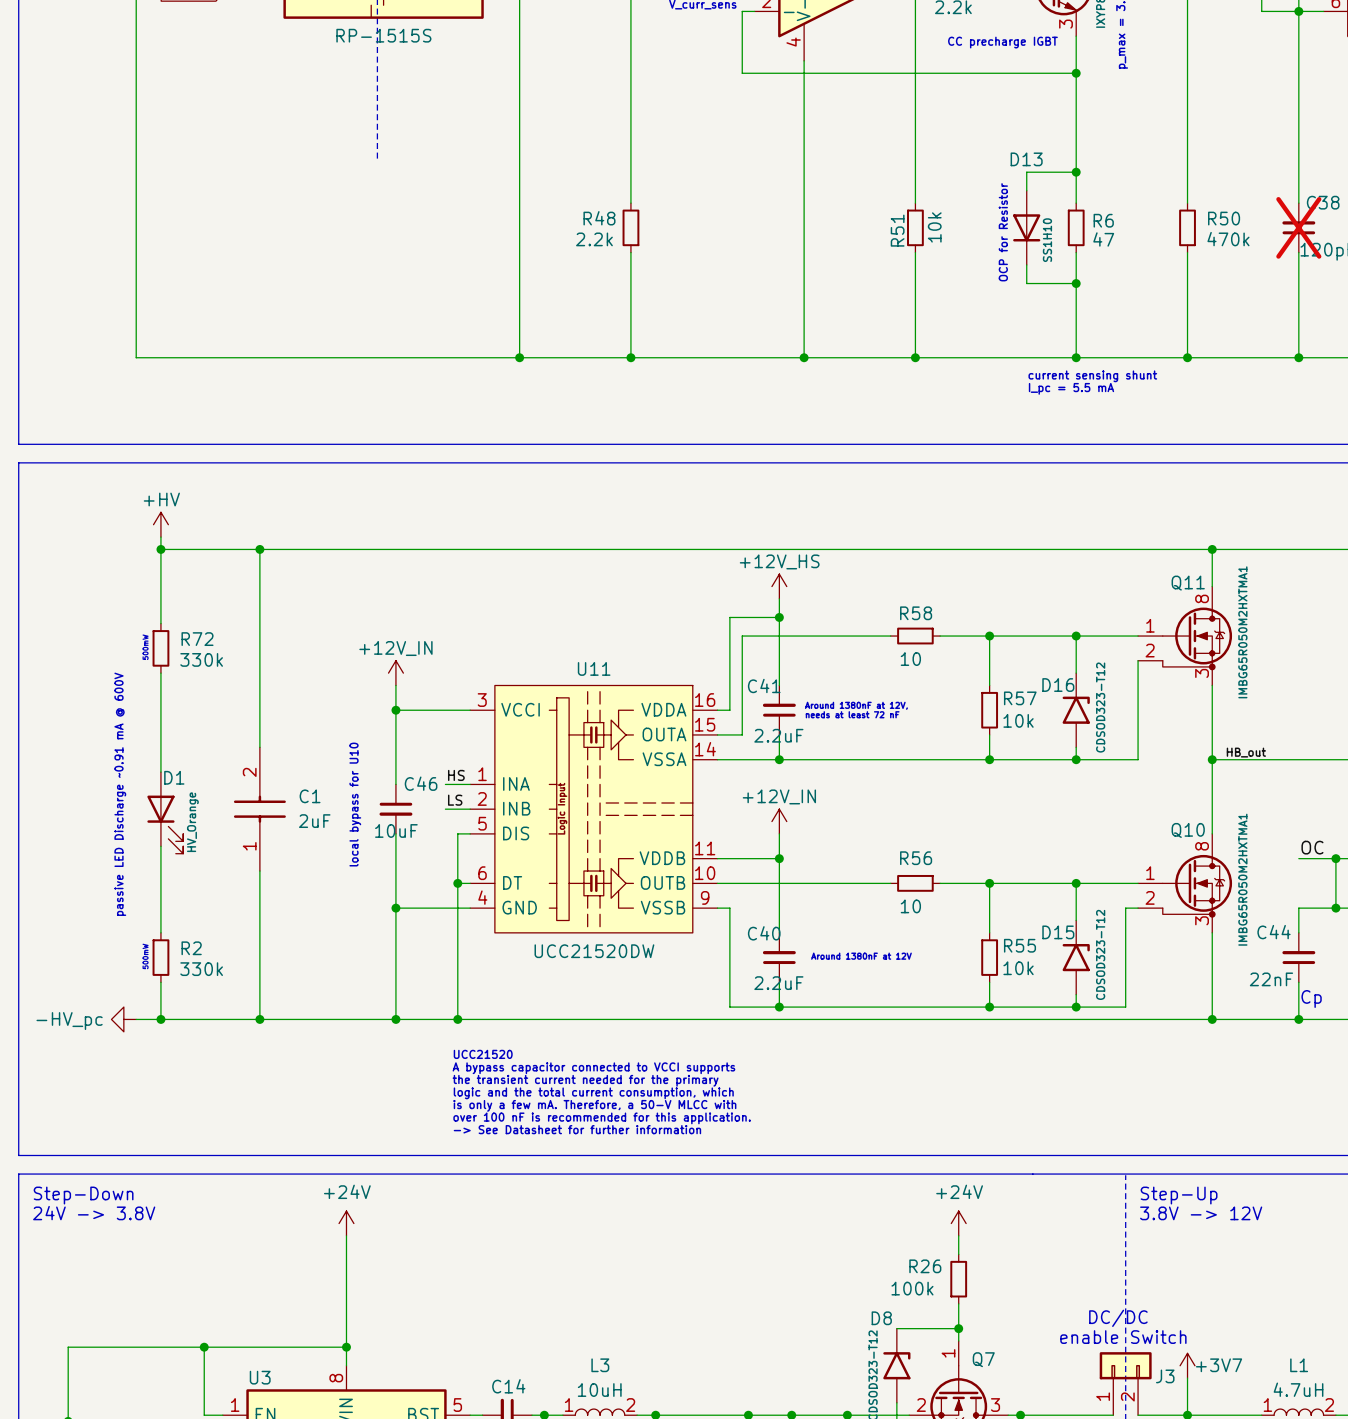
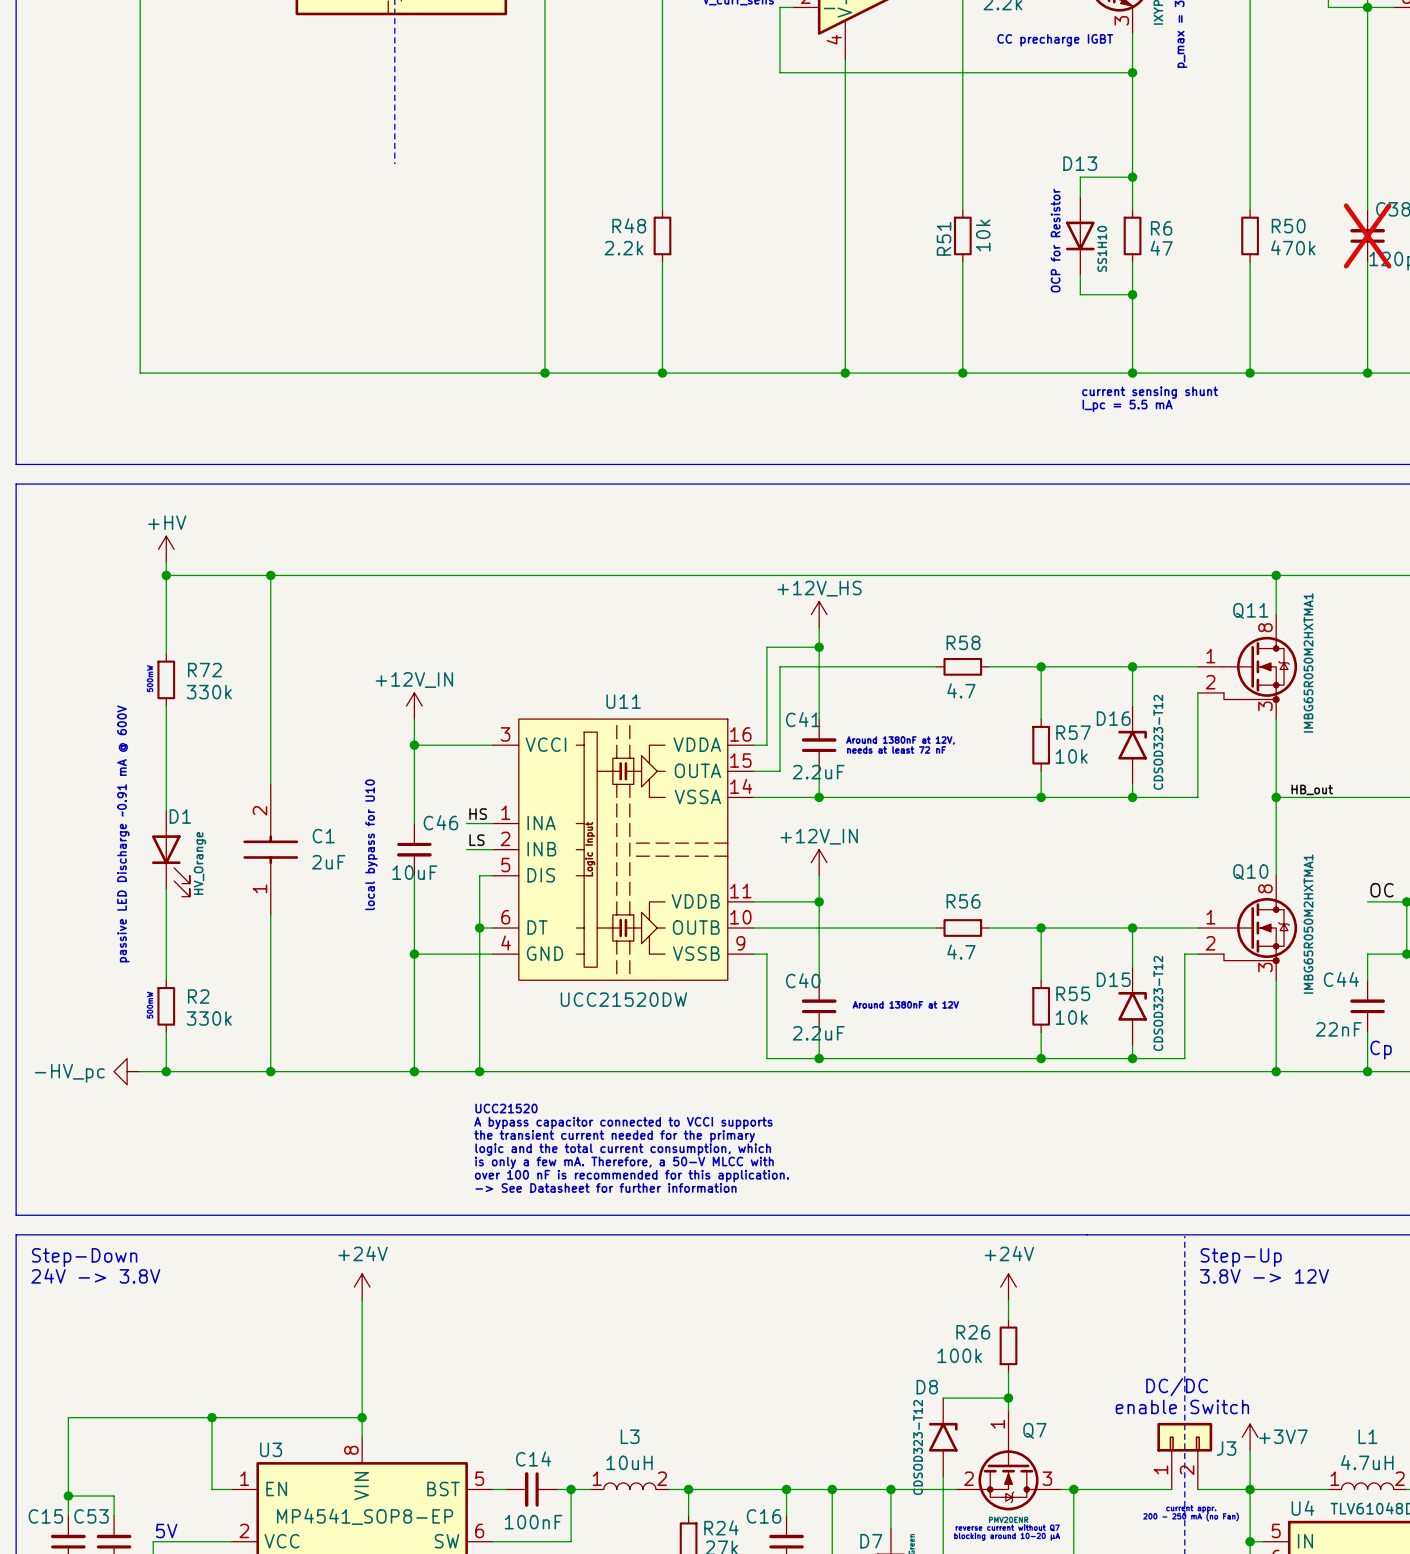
part value: RP-1515S (383, 35) -> none
R58 value: 10 (910, 659) -> 4.7 (961, 690)
R56 value: 10 (910, 906) -> 4.7 (961, 952)

